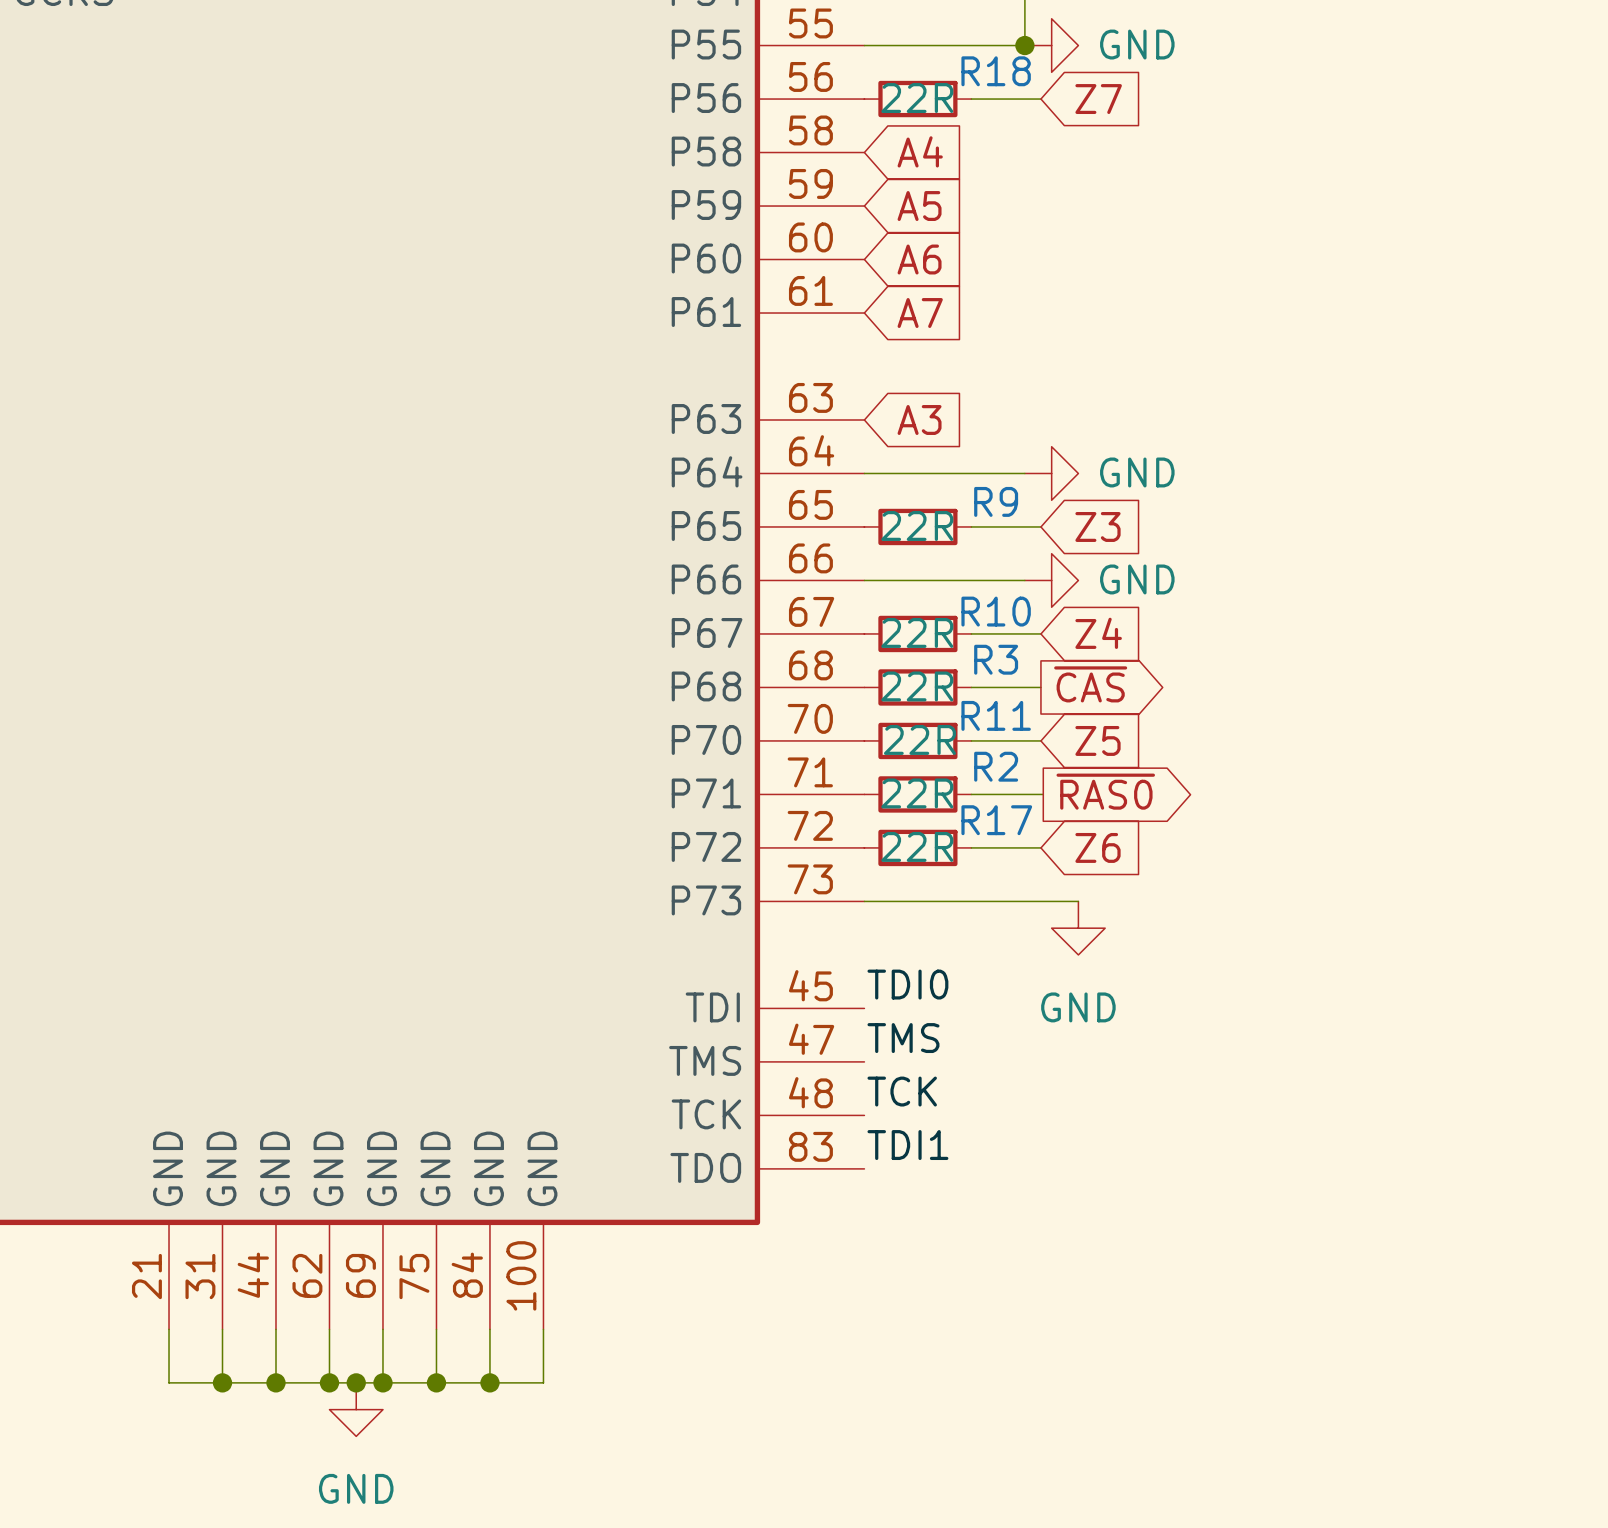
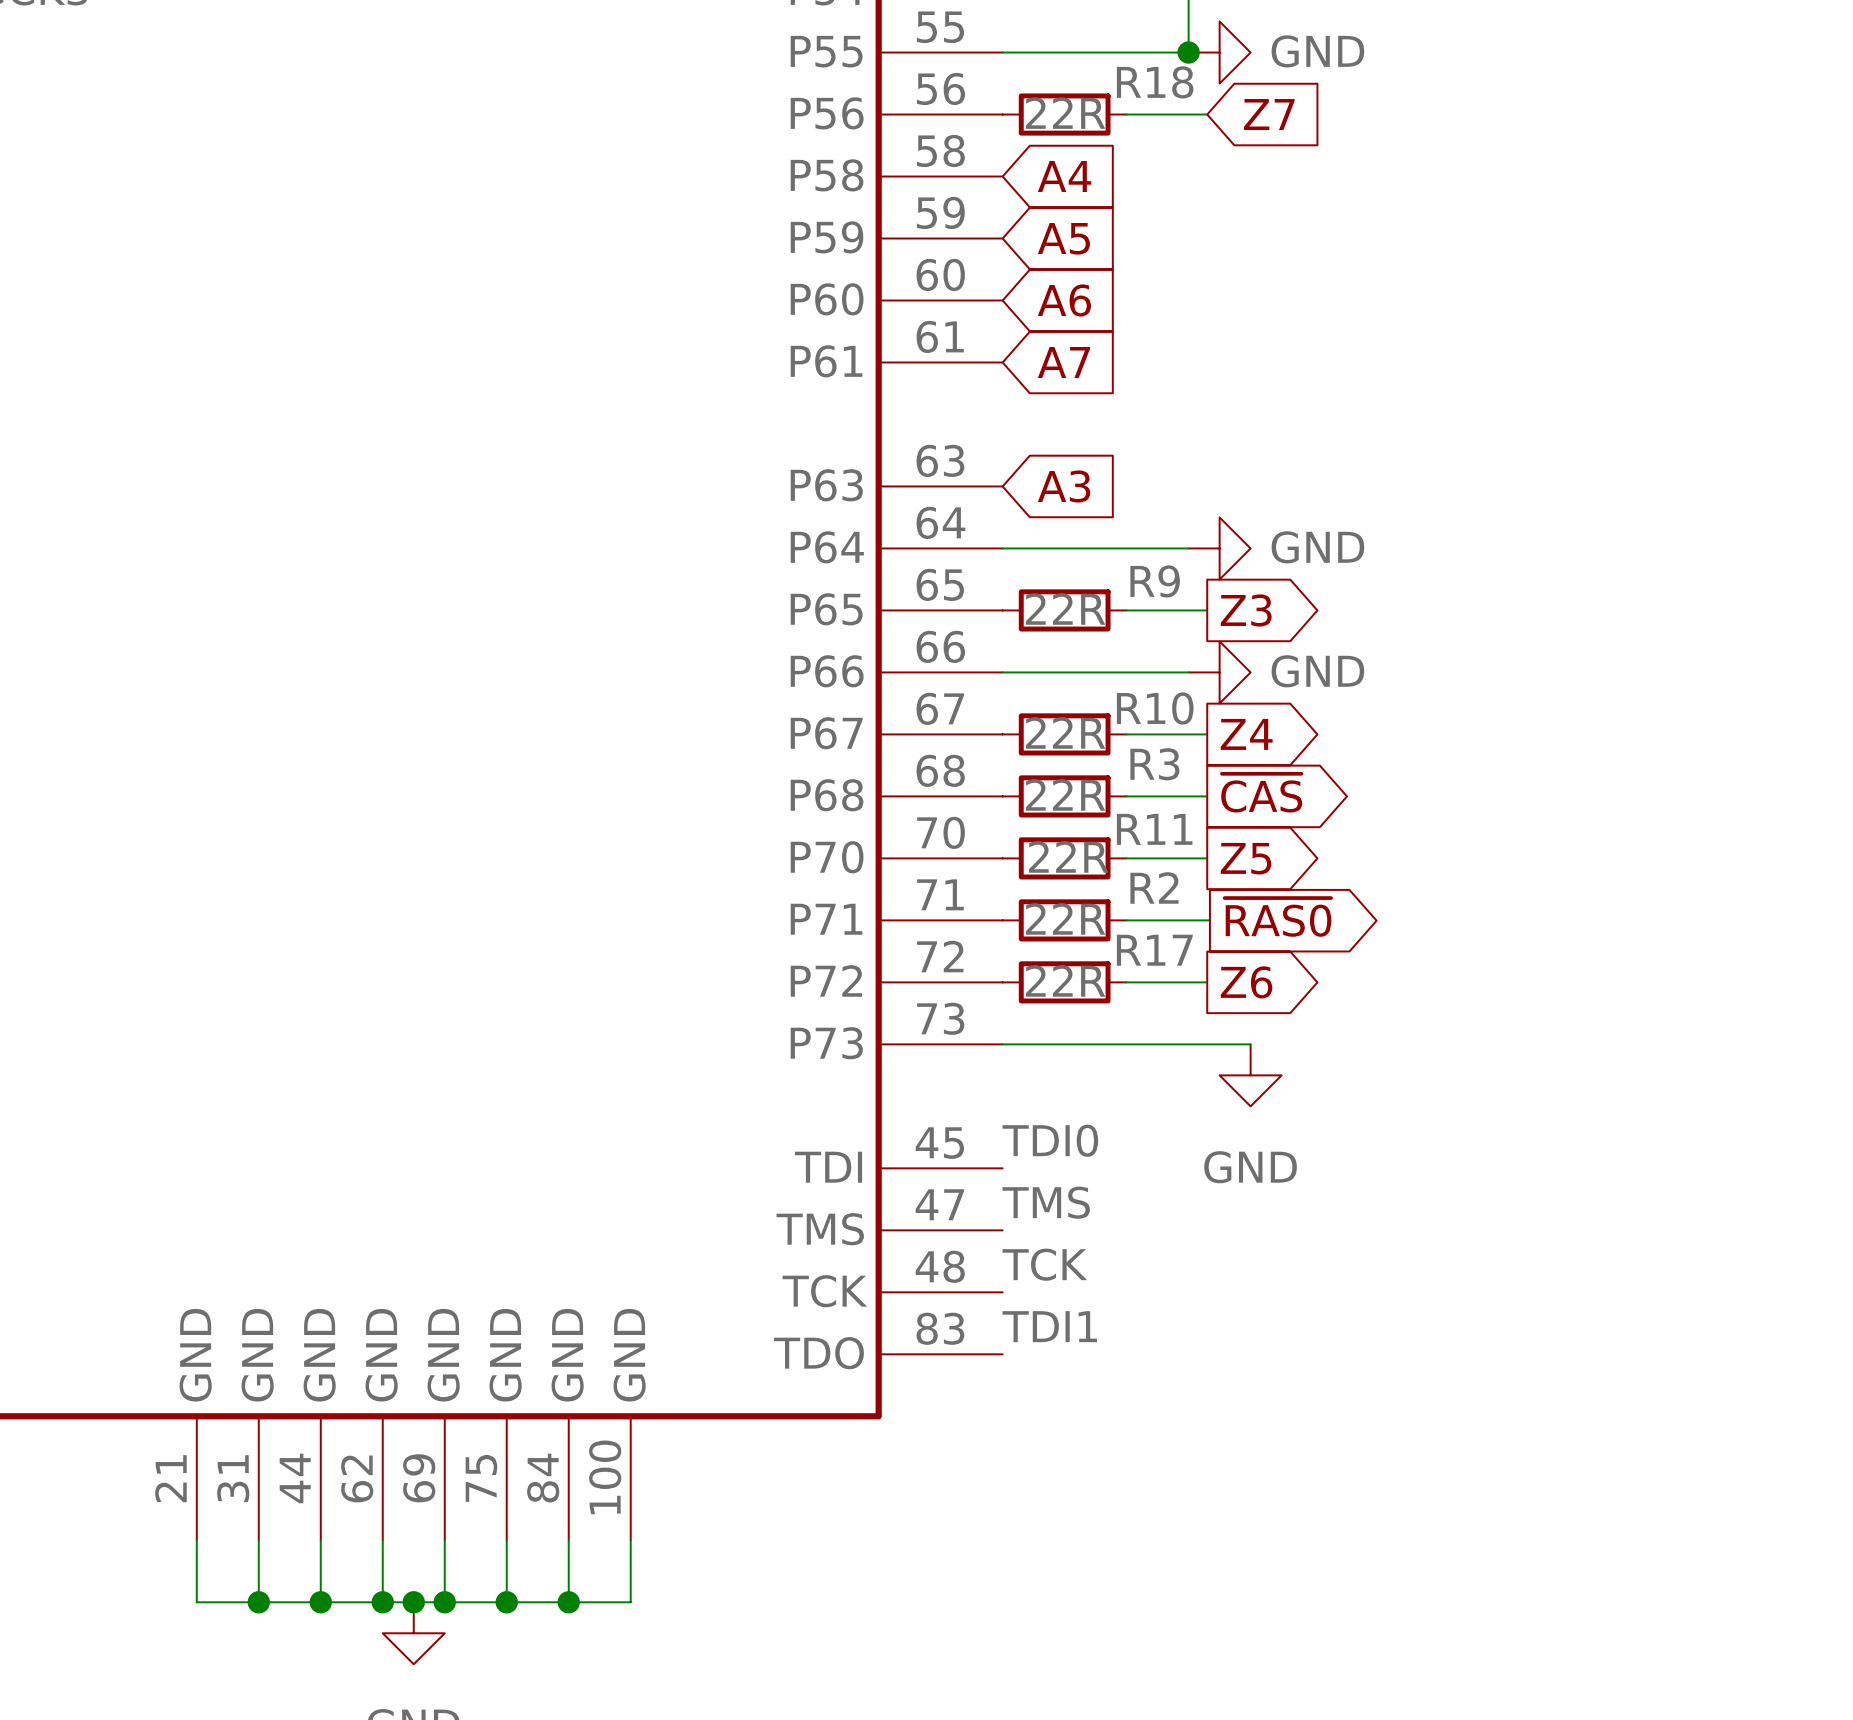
global label shape: input (1097, 526) -> output (1246, 610)
global label shape: input (1098, 633) -> output (1246, 734)
global label shape: input (1097, 740) -> output (1246, 858)
global label shape: input (1097, 847) -> output (1246, 982)

